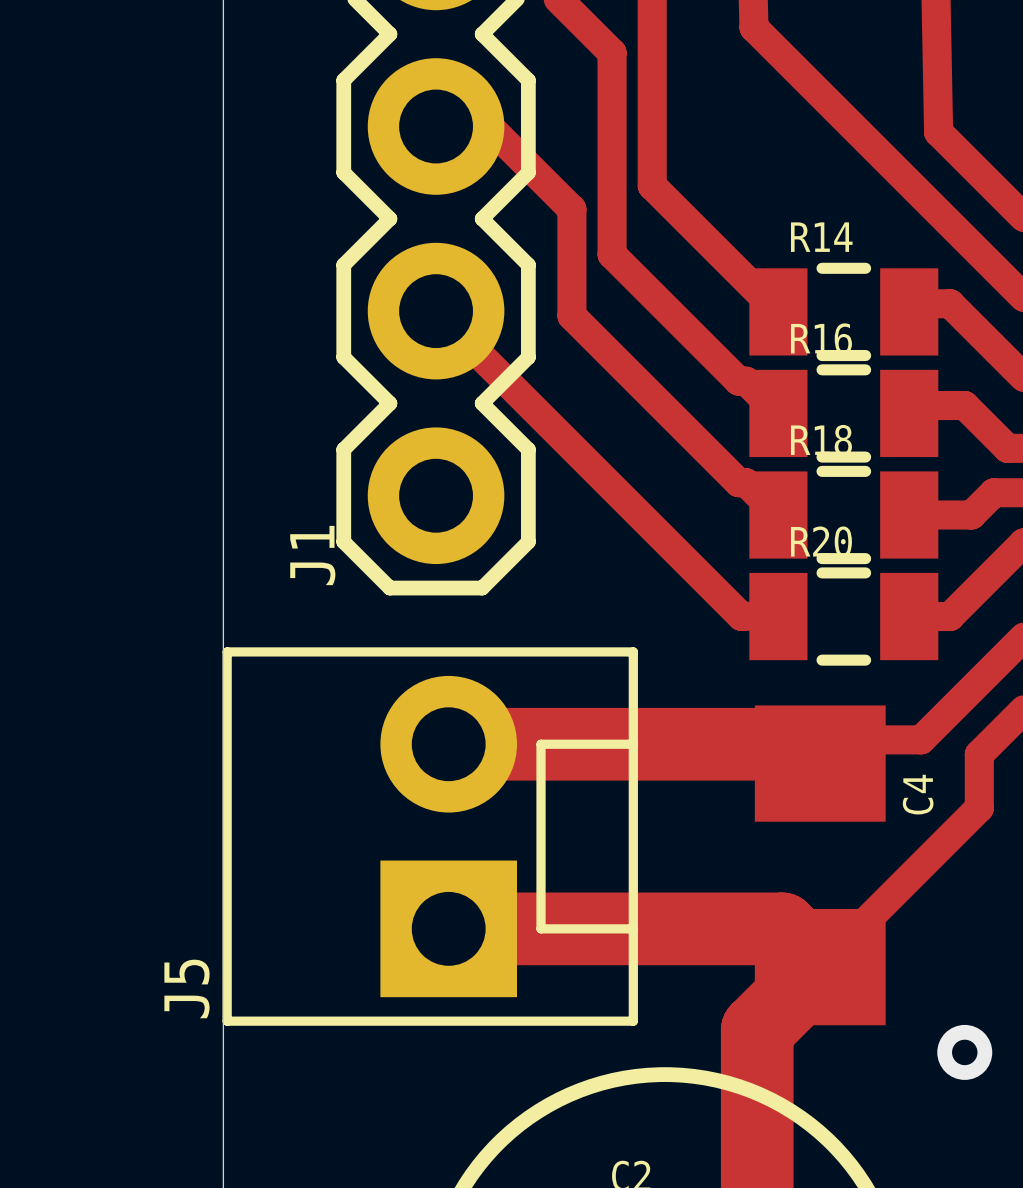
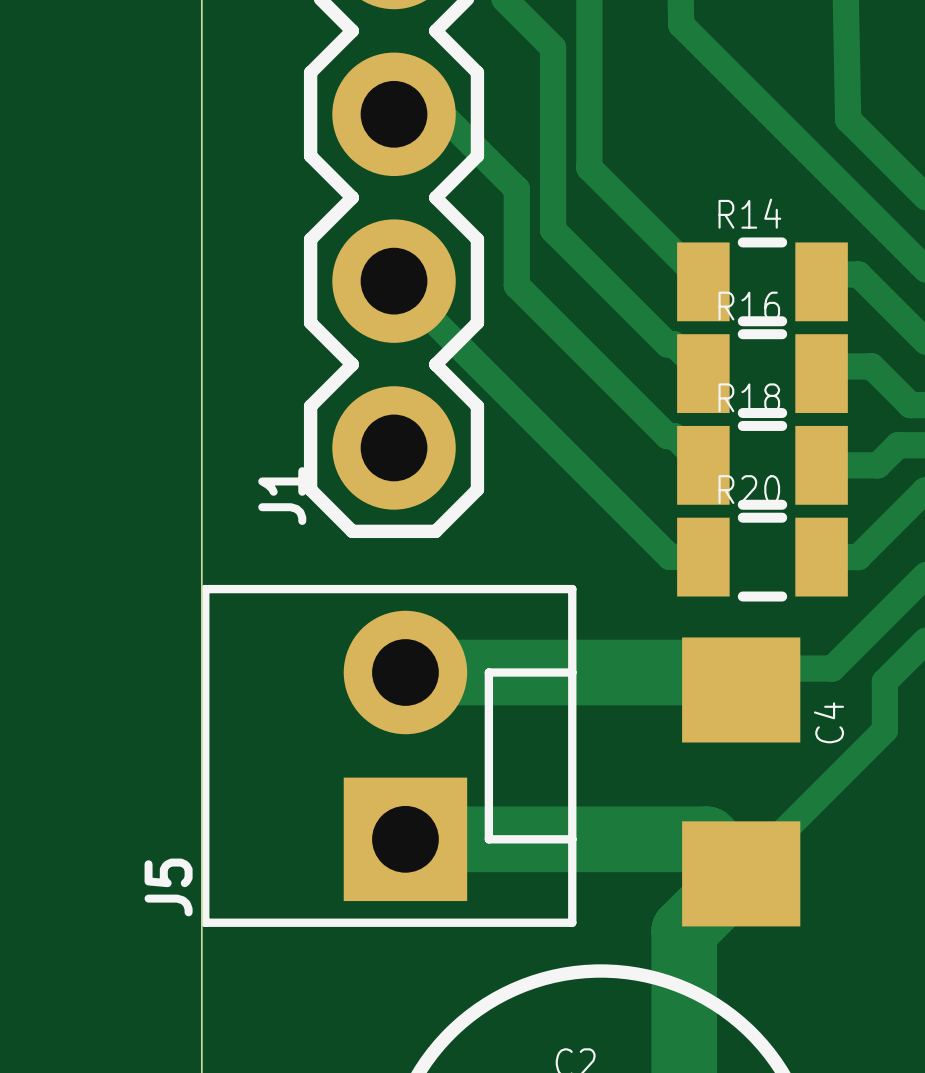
via: (964, 1052) -> none

